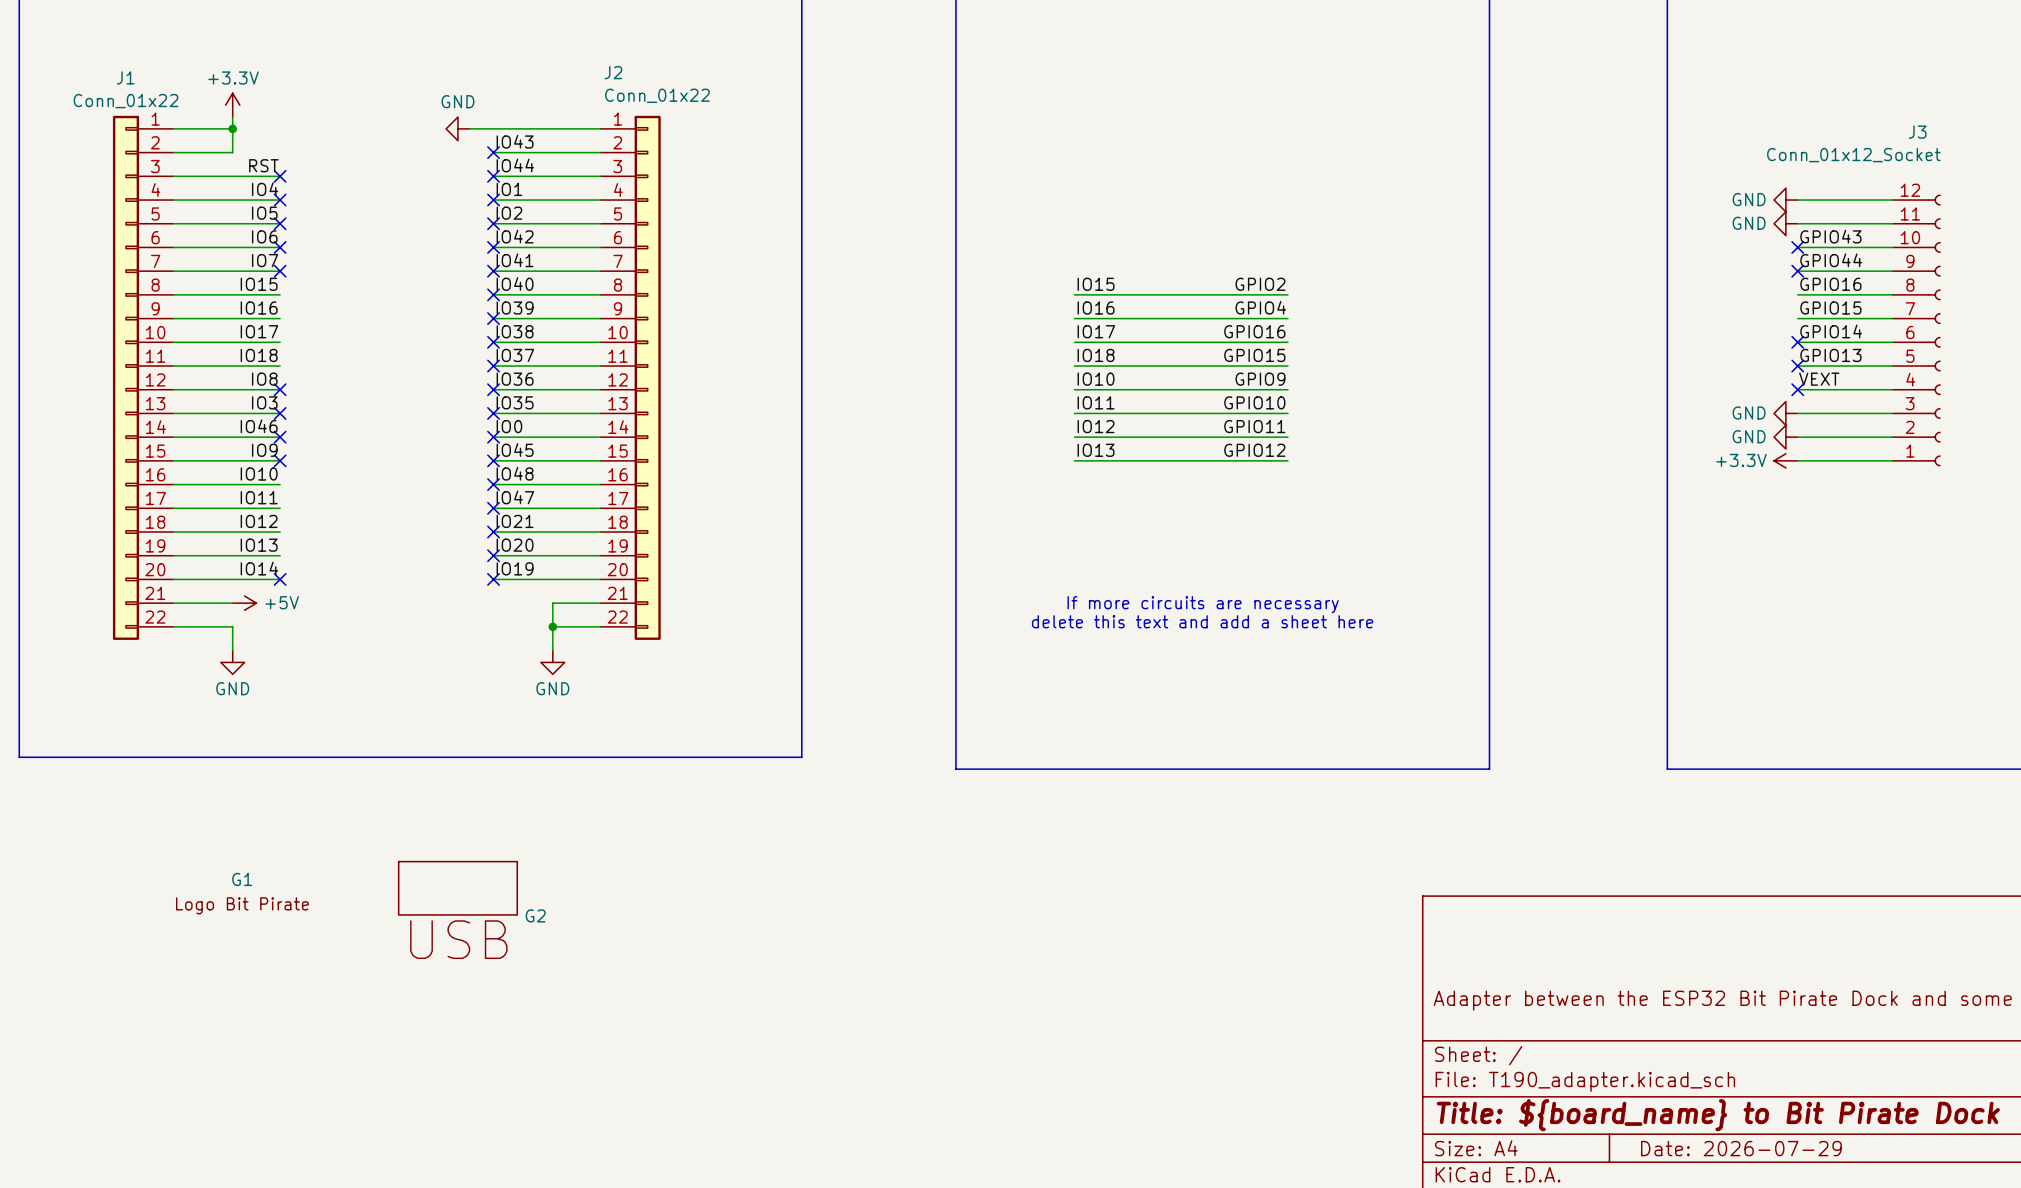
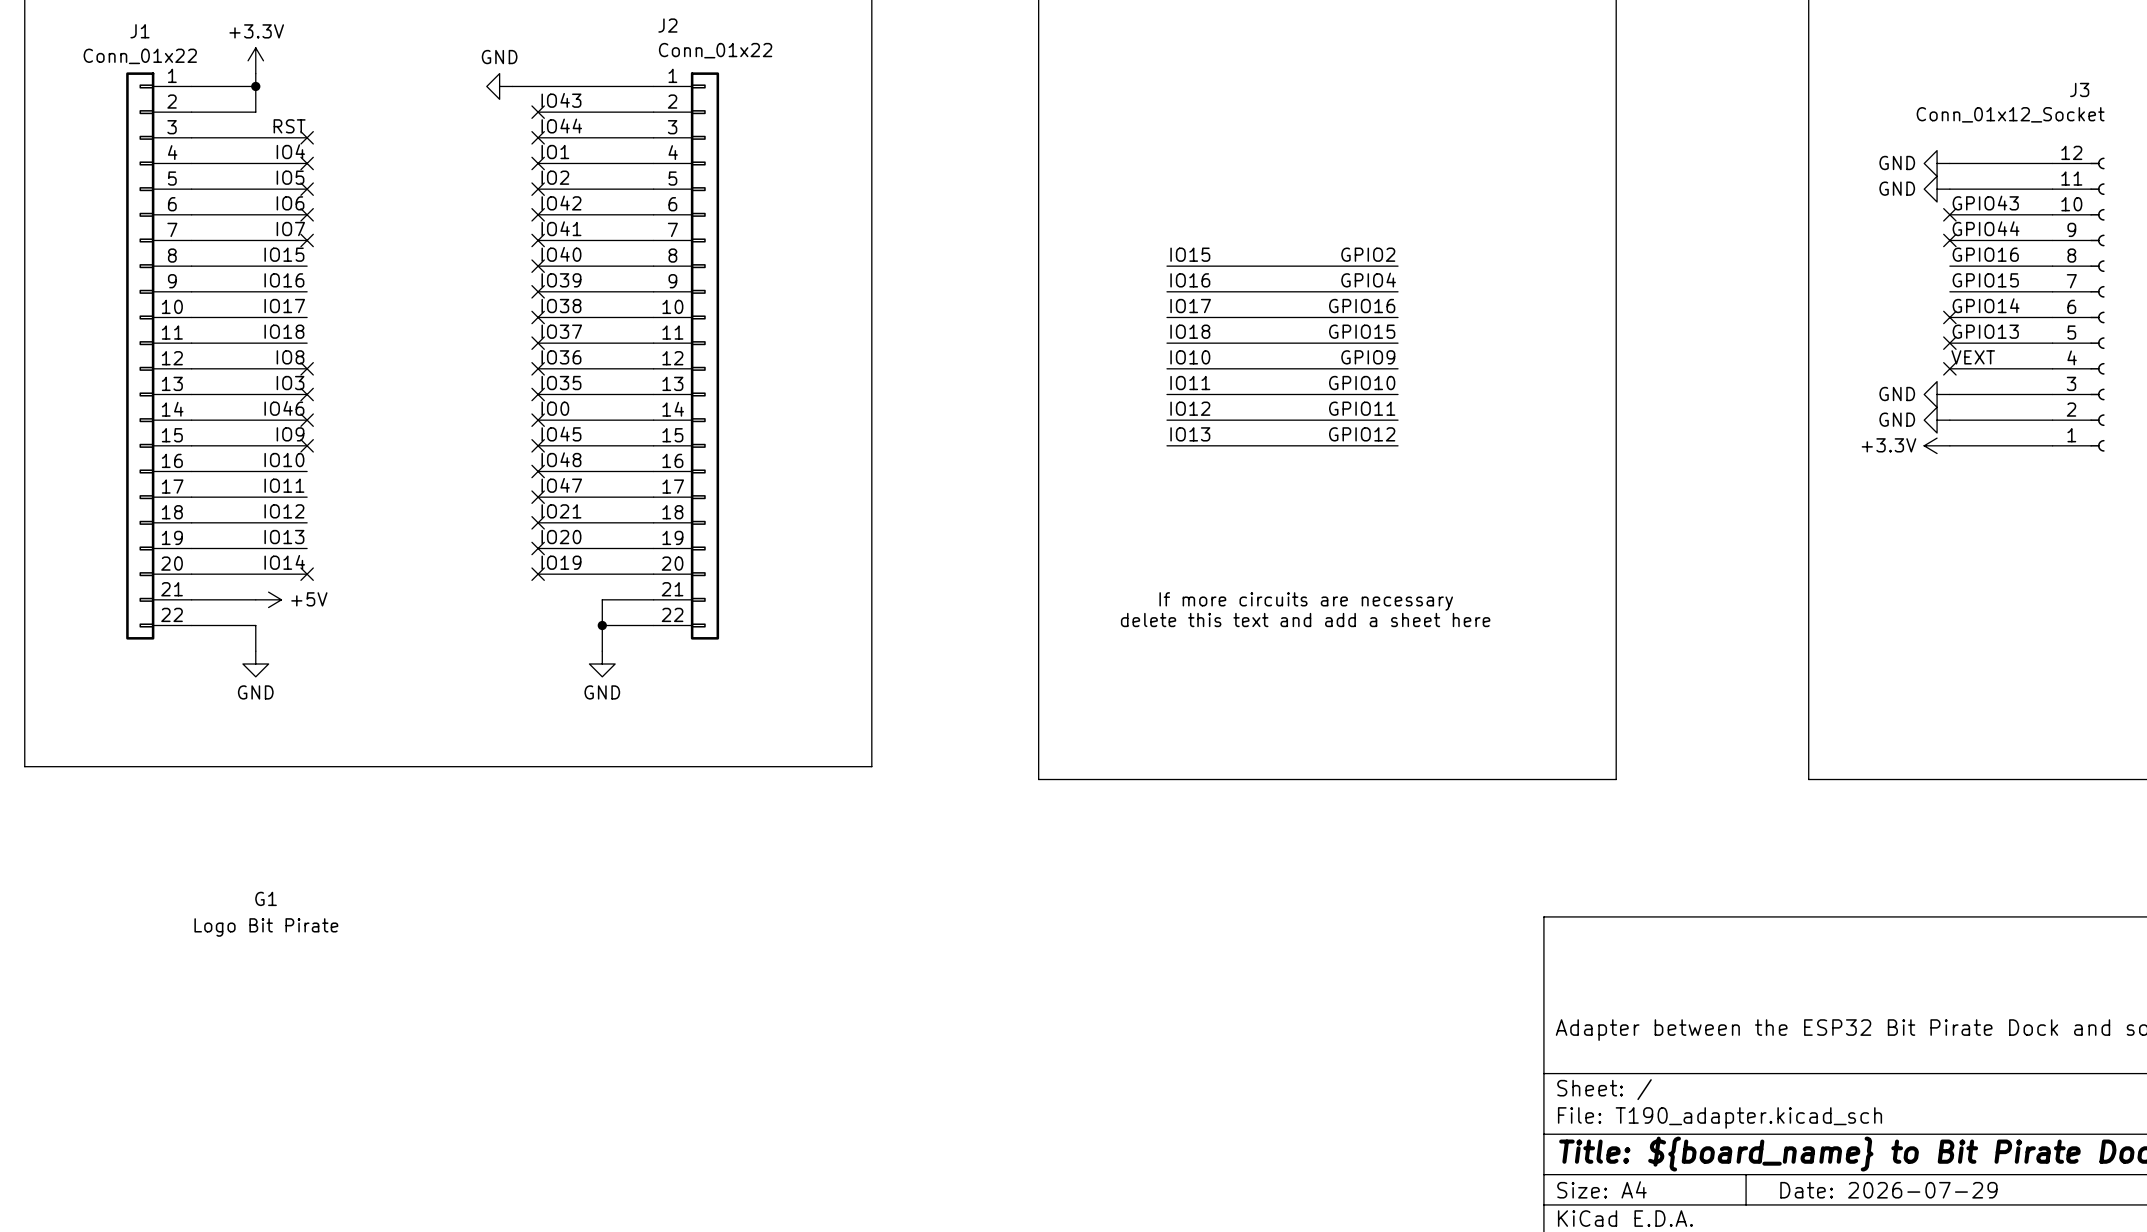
G2: (457, 888) -> none

